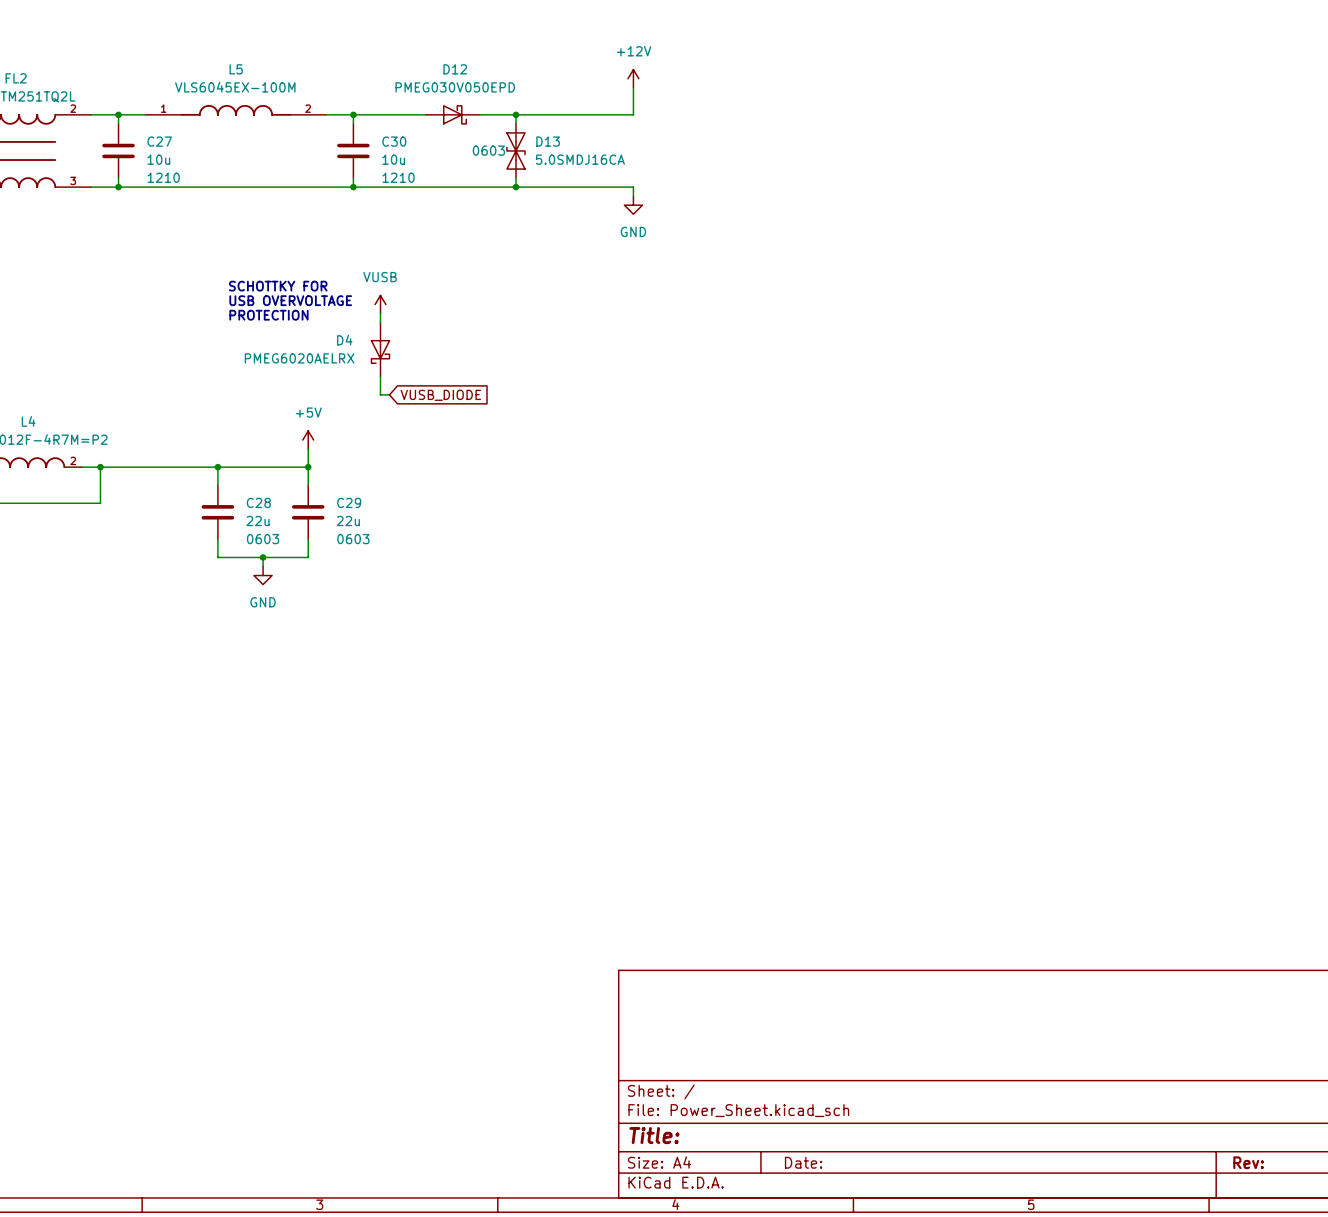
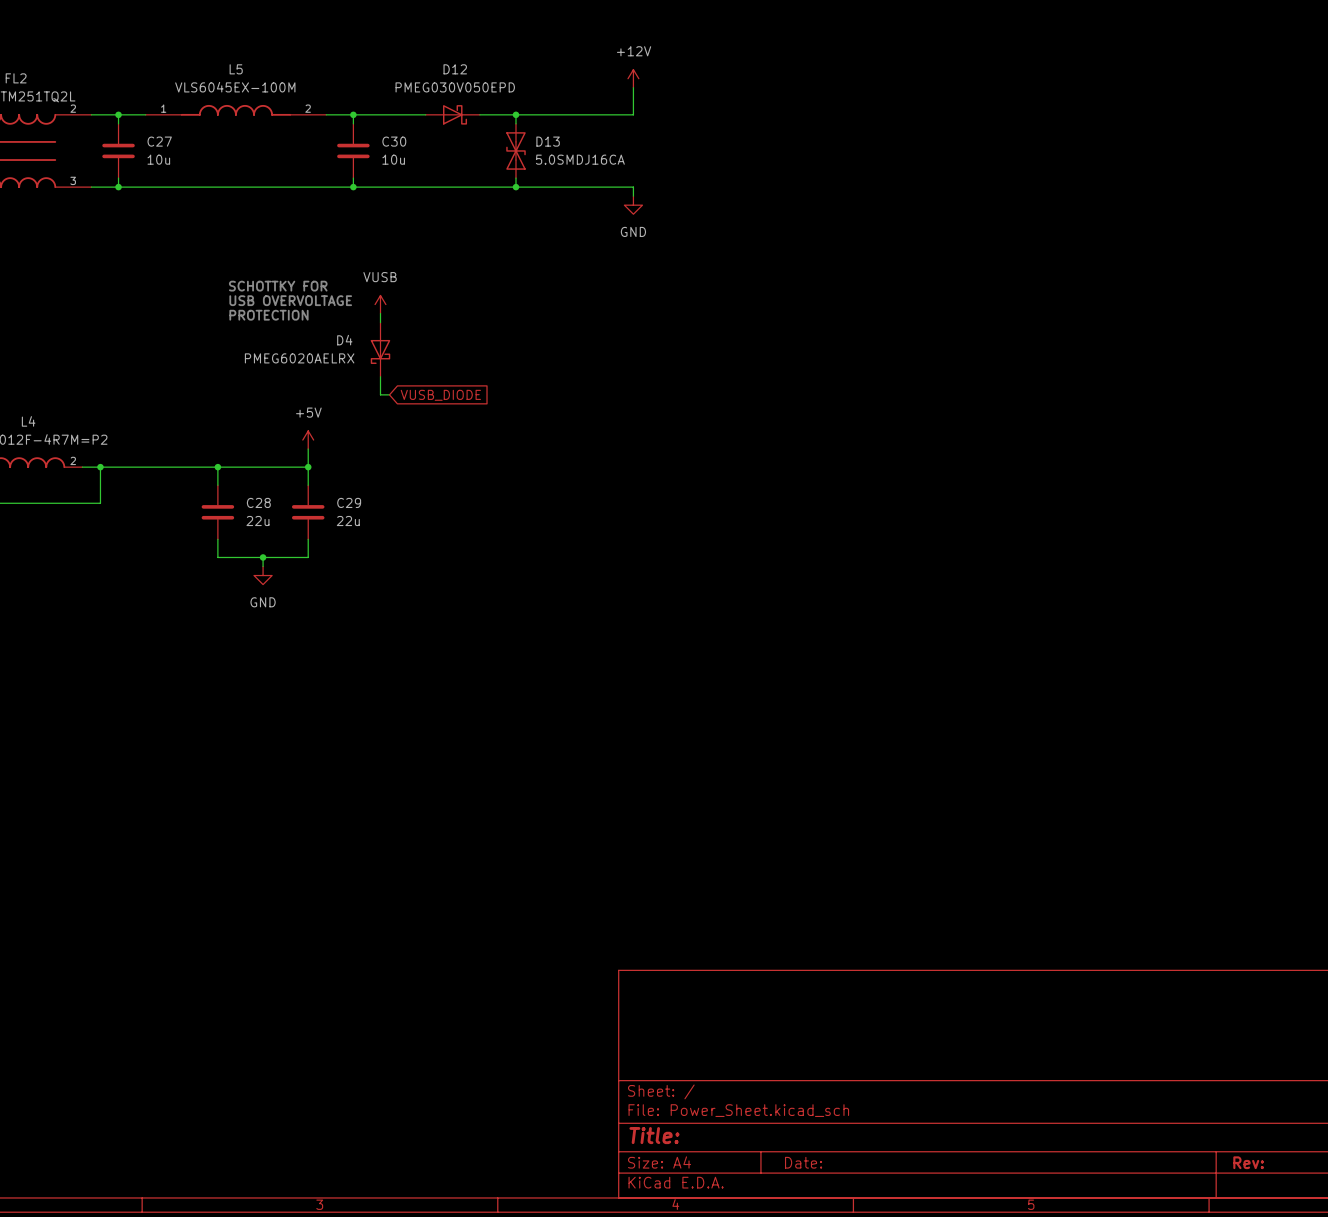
D13 text: 0603 (488, 150) -> none
C27 text: 1210 (163, 177) -> none
C30 text: 1210 (398, 177) -> none
C28 text: 0603 (263, 539) -> none
C29 text: 0603 (353, 539) -> none

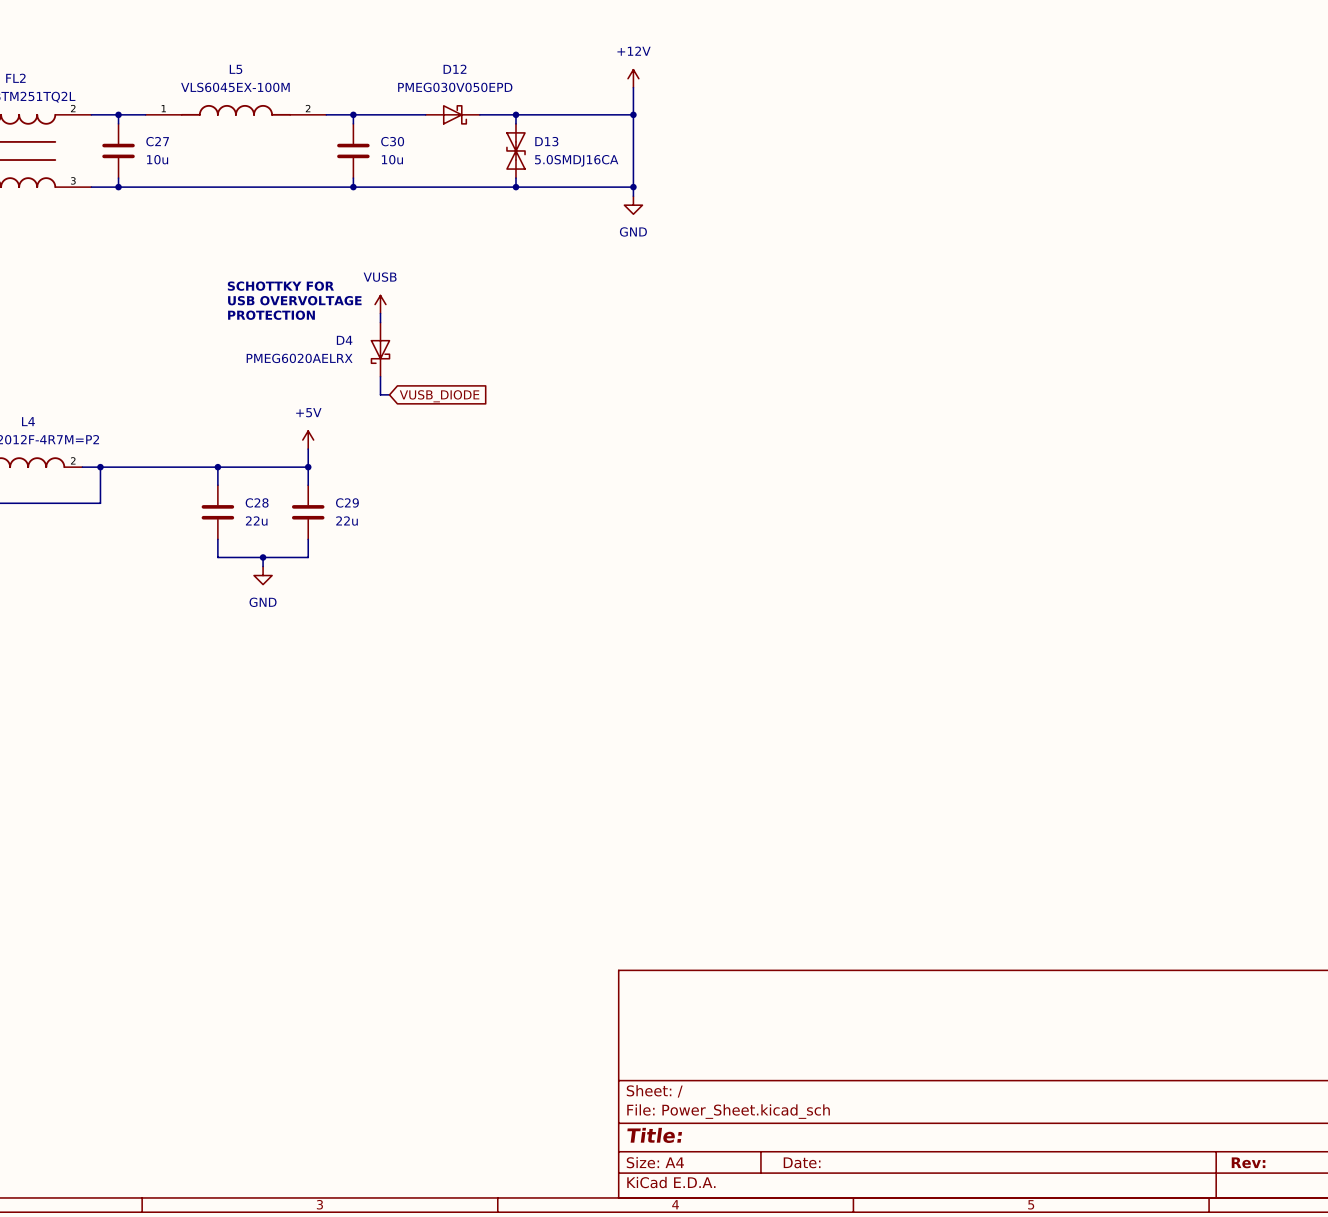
wire: none -> (633, 114) (633, 187)
junction: none -> (633, 114)
junction: none -> (633, 187)

